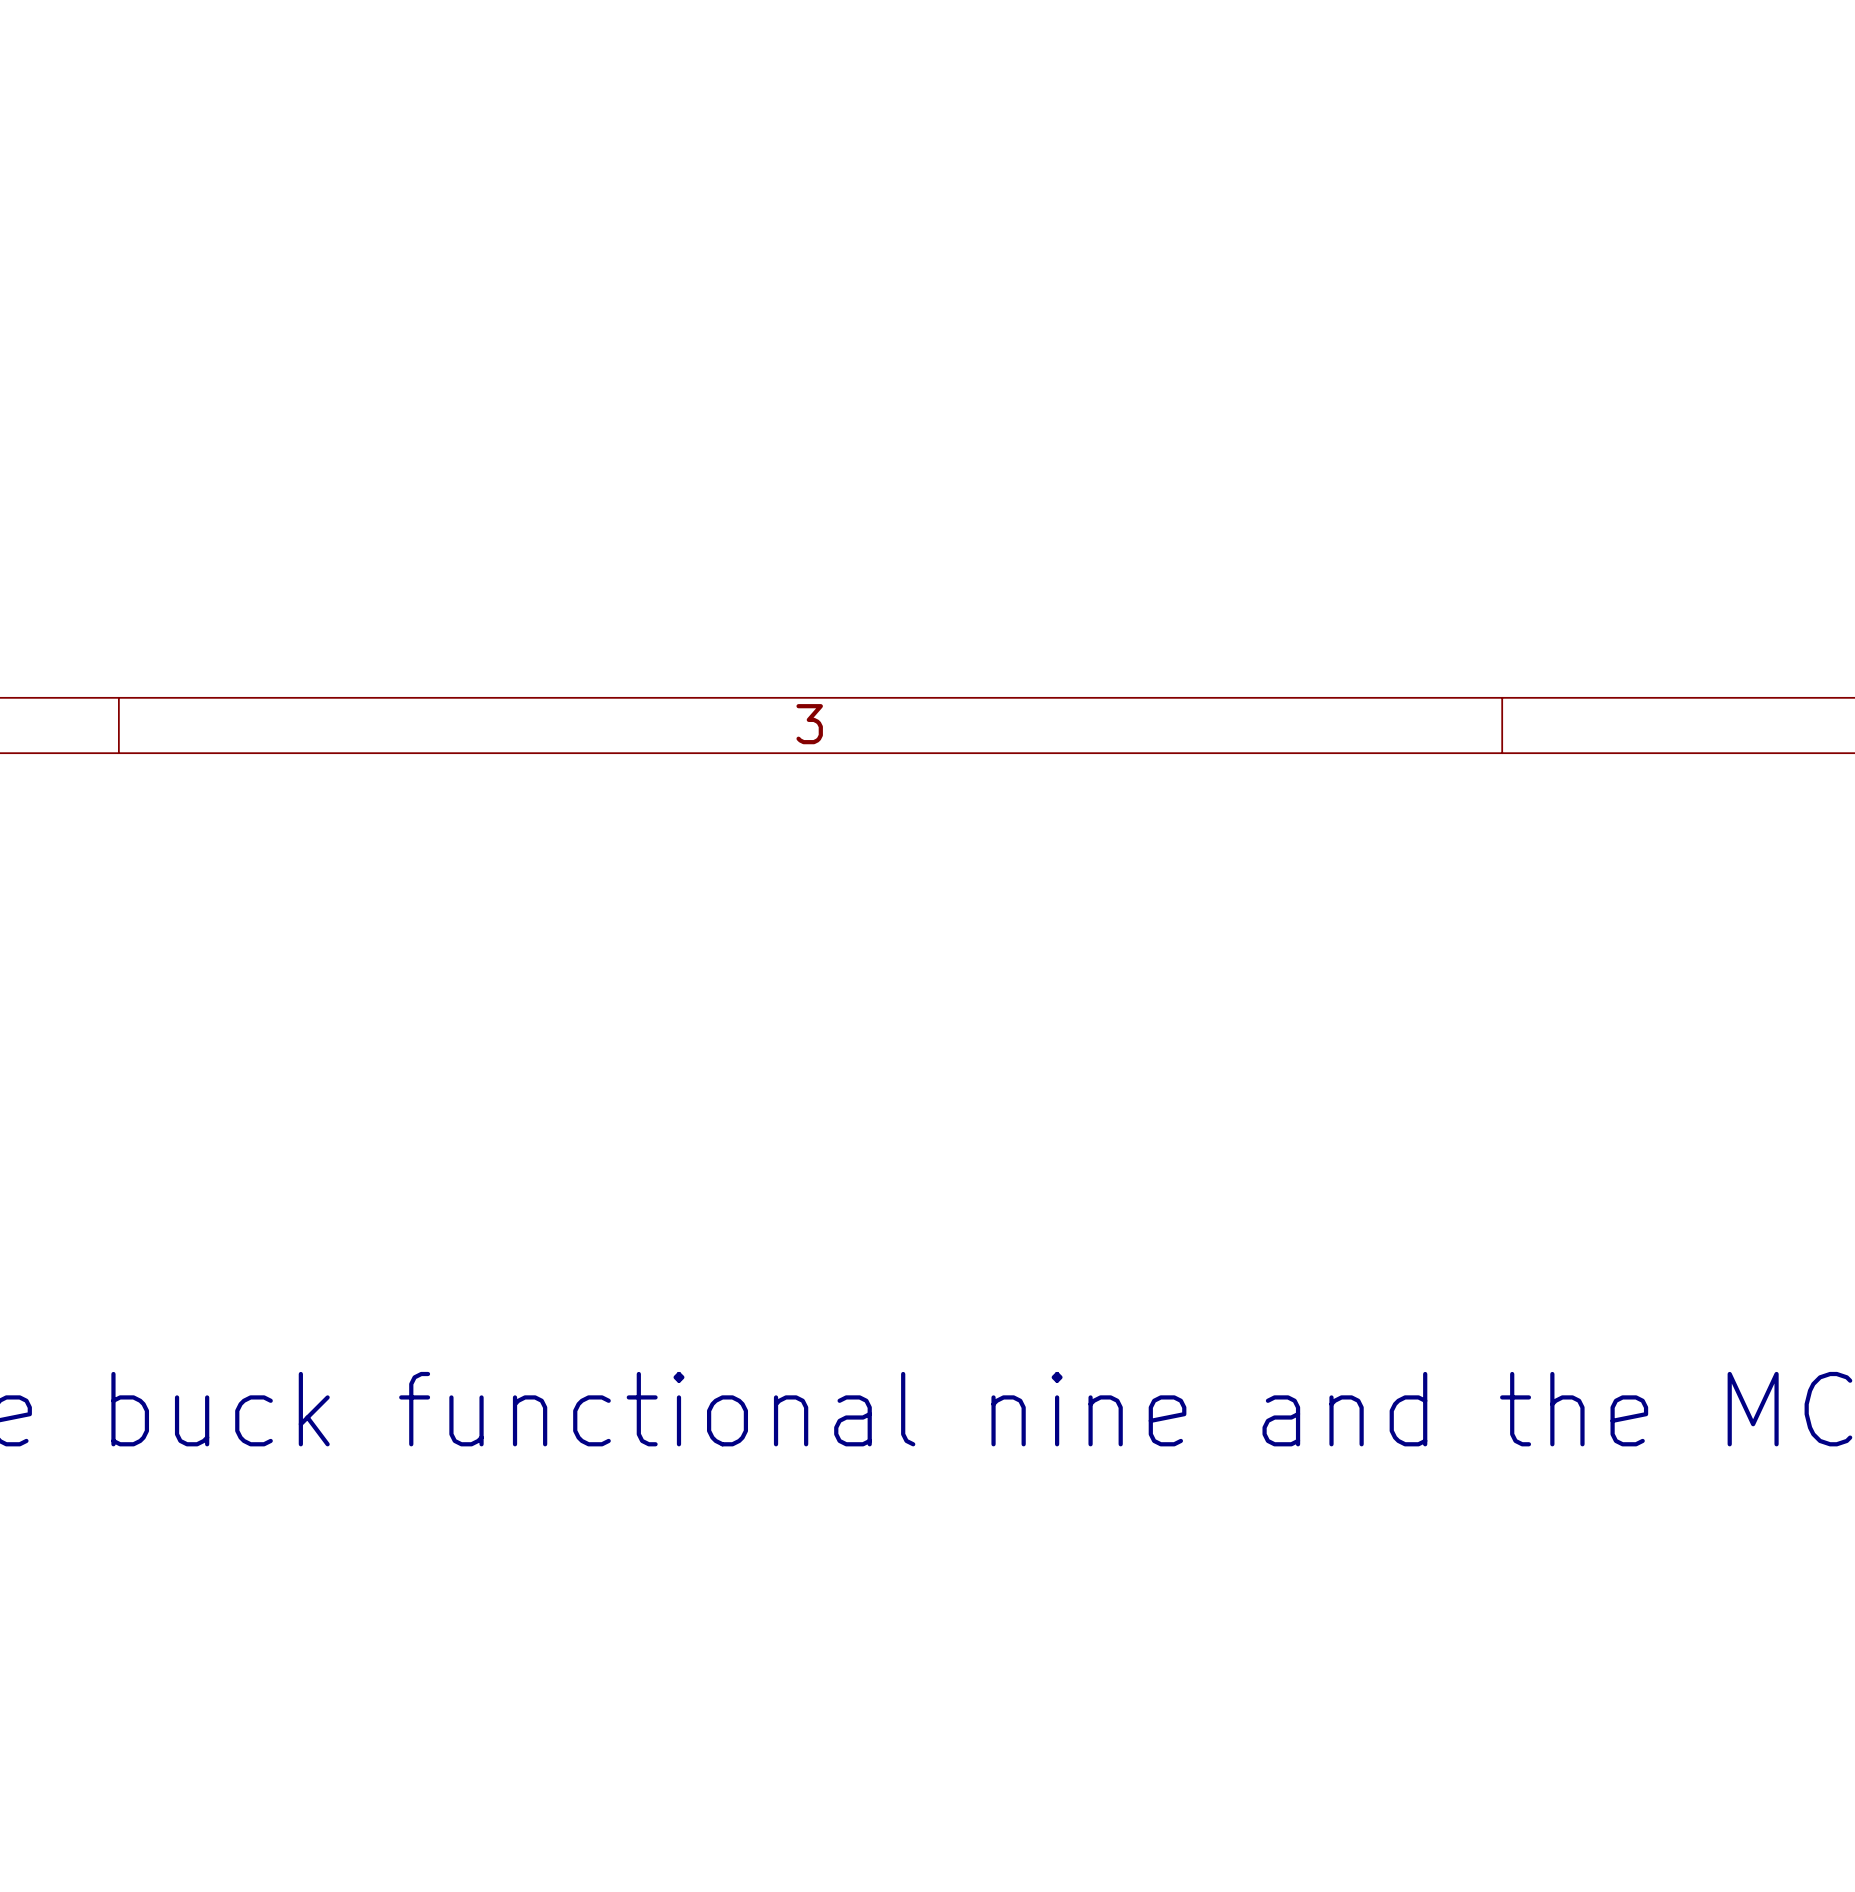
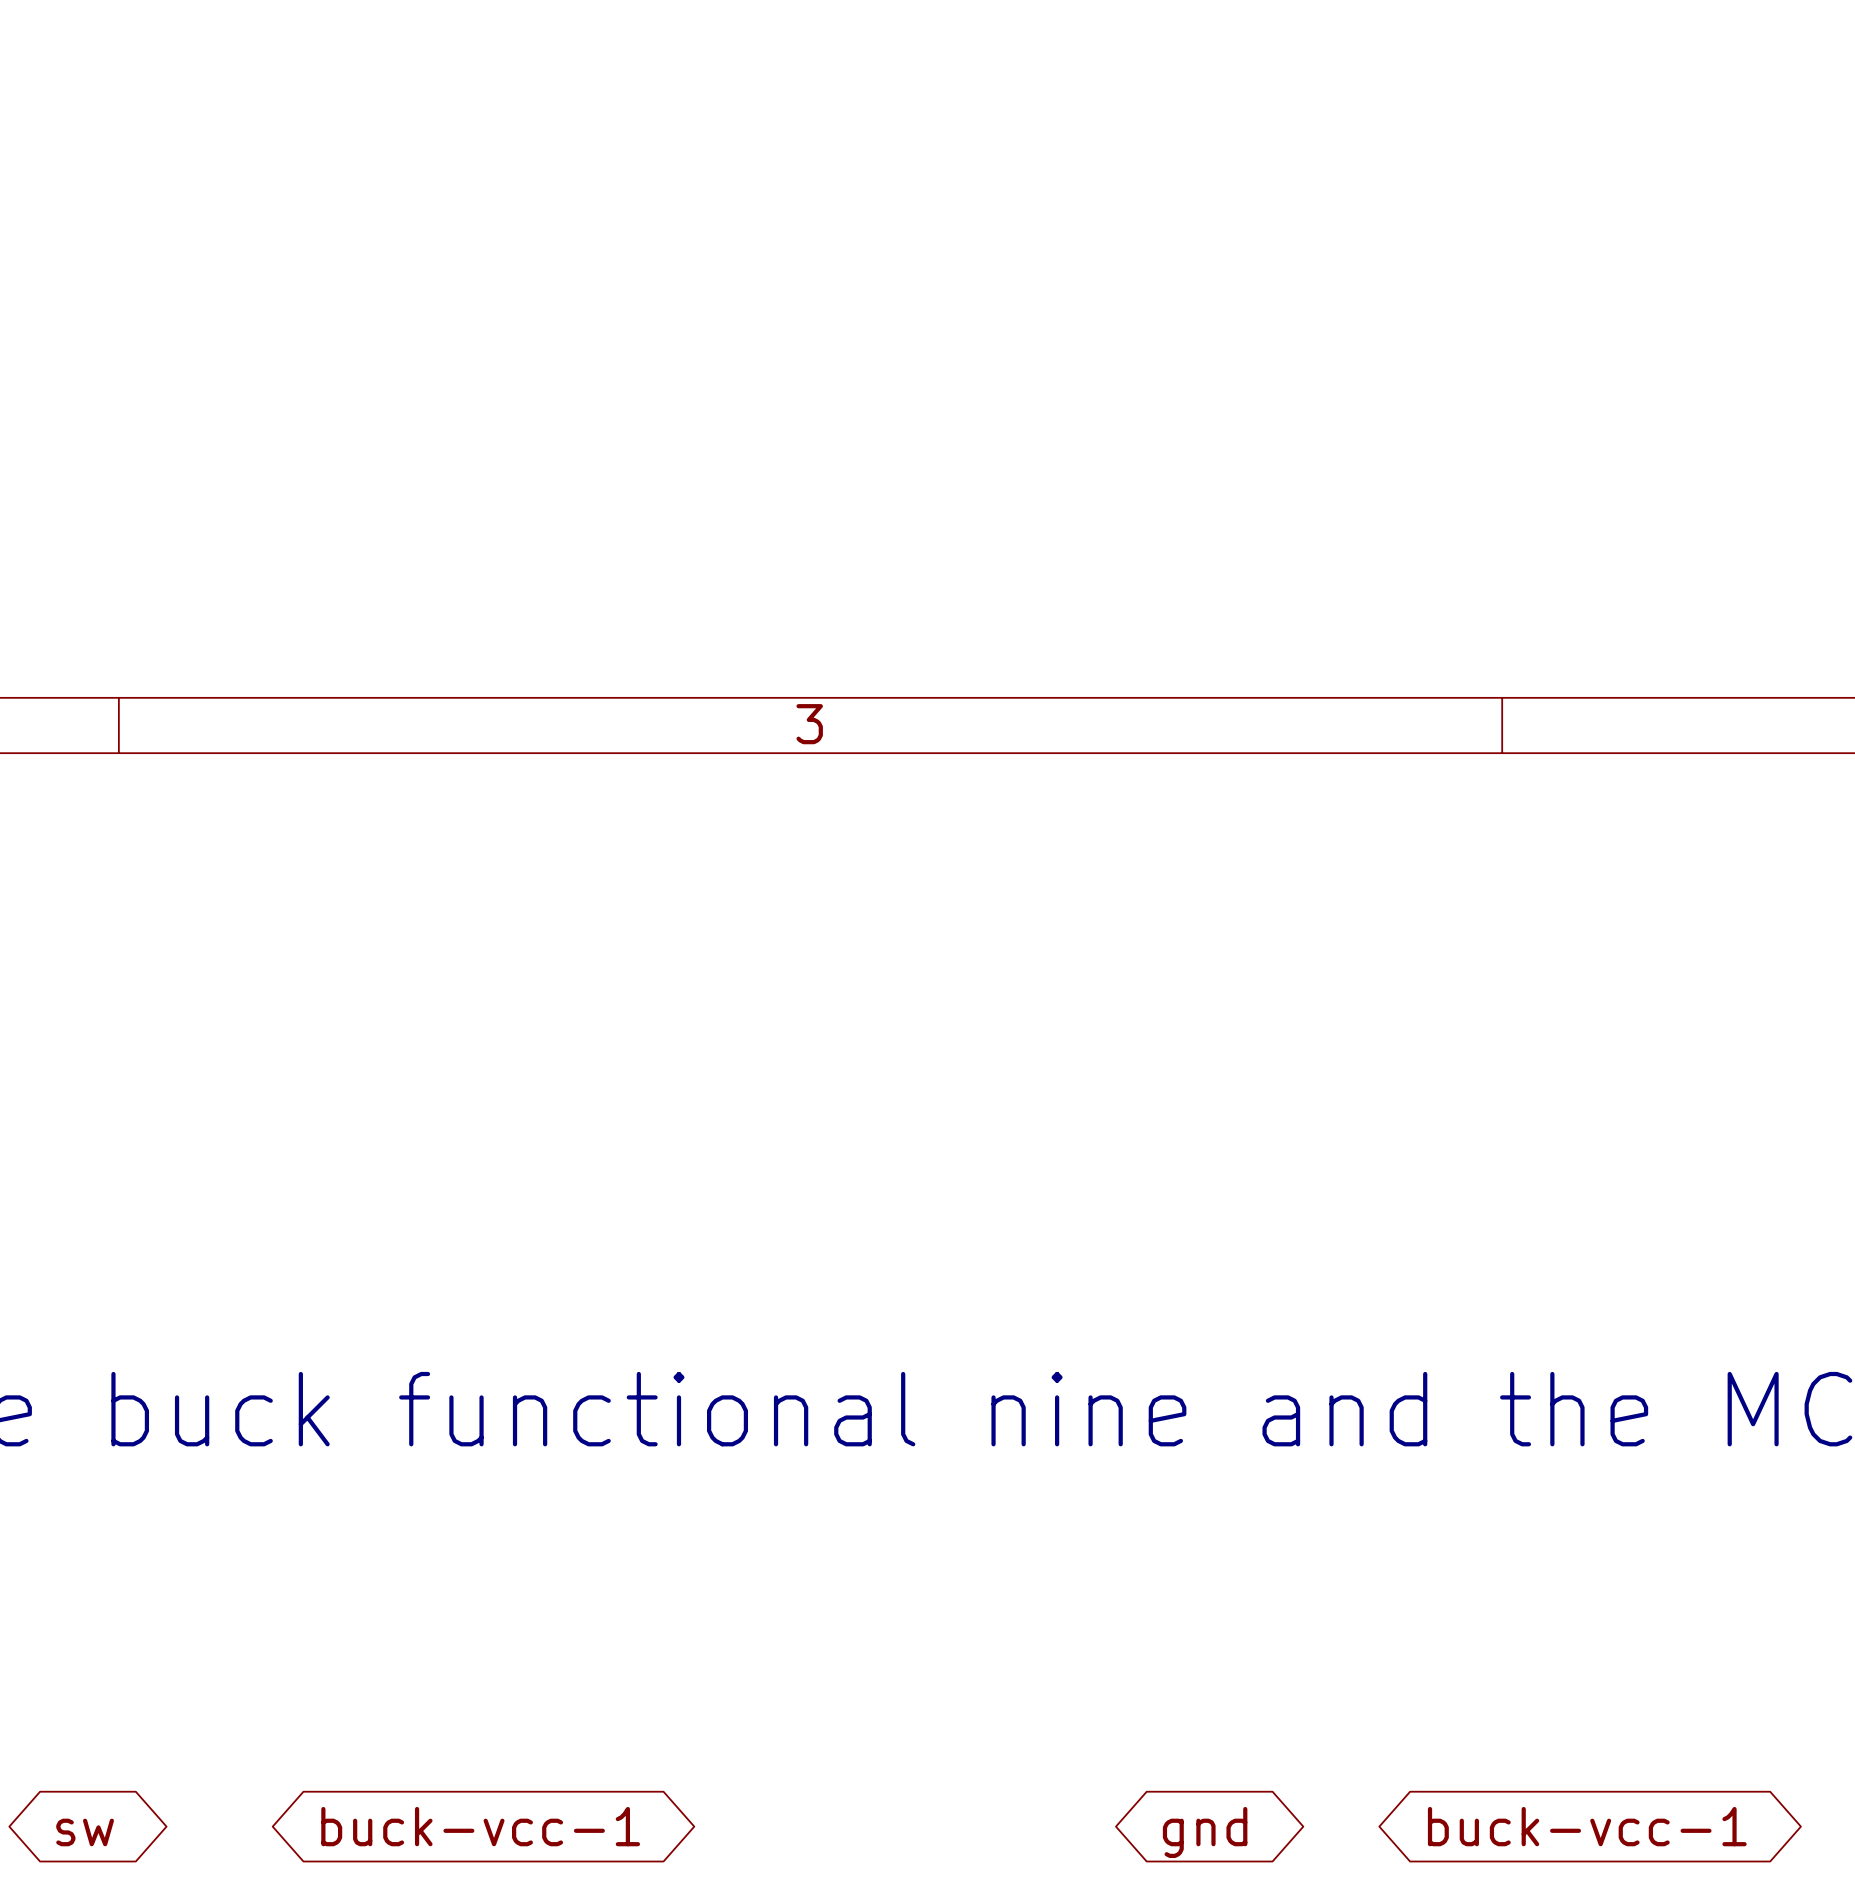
global label: none -> buck-vcc-1 (480, 1826)
global label: none -> buck-vcc-1 (1587, 1826)
global label: none -> sw (85, 1832)
global label: none -> gnd (1205, 1832)

